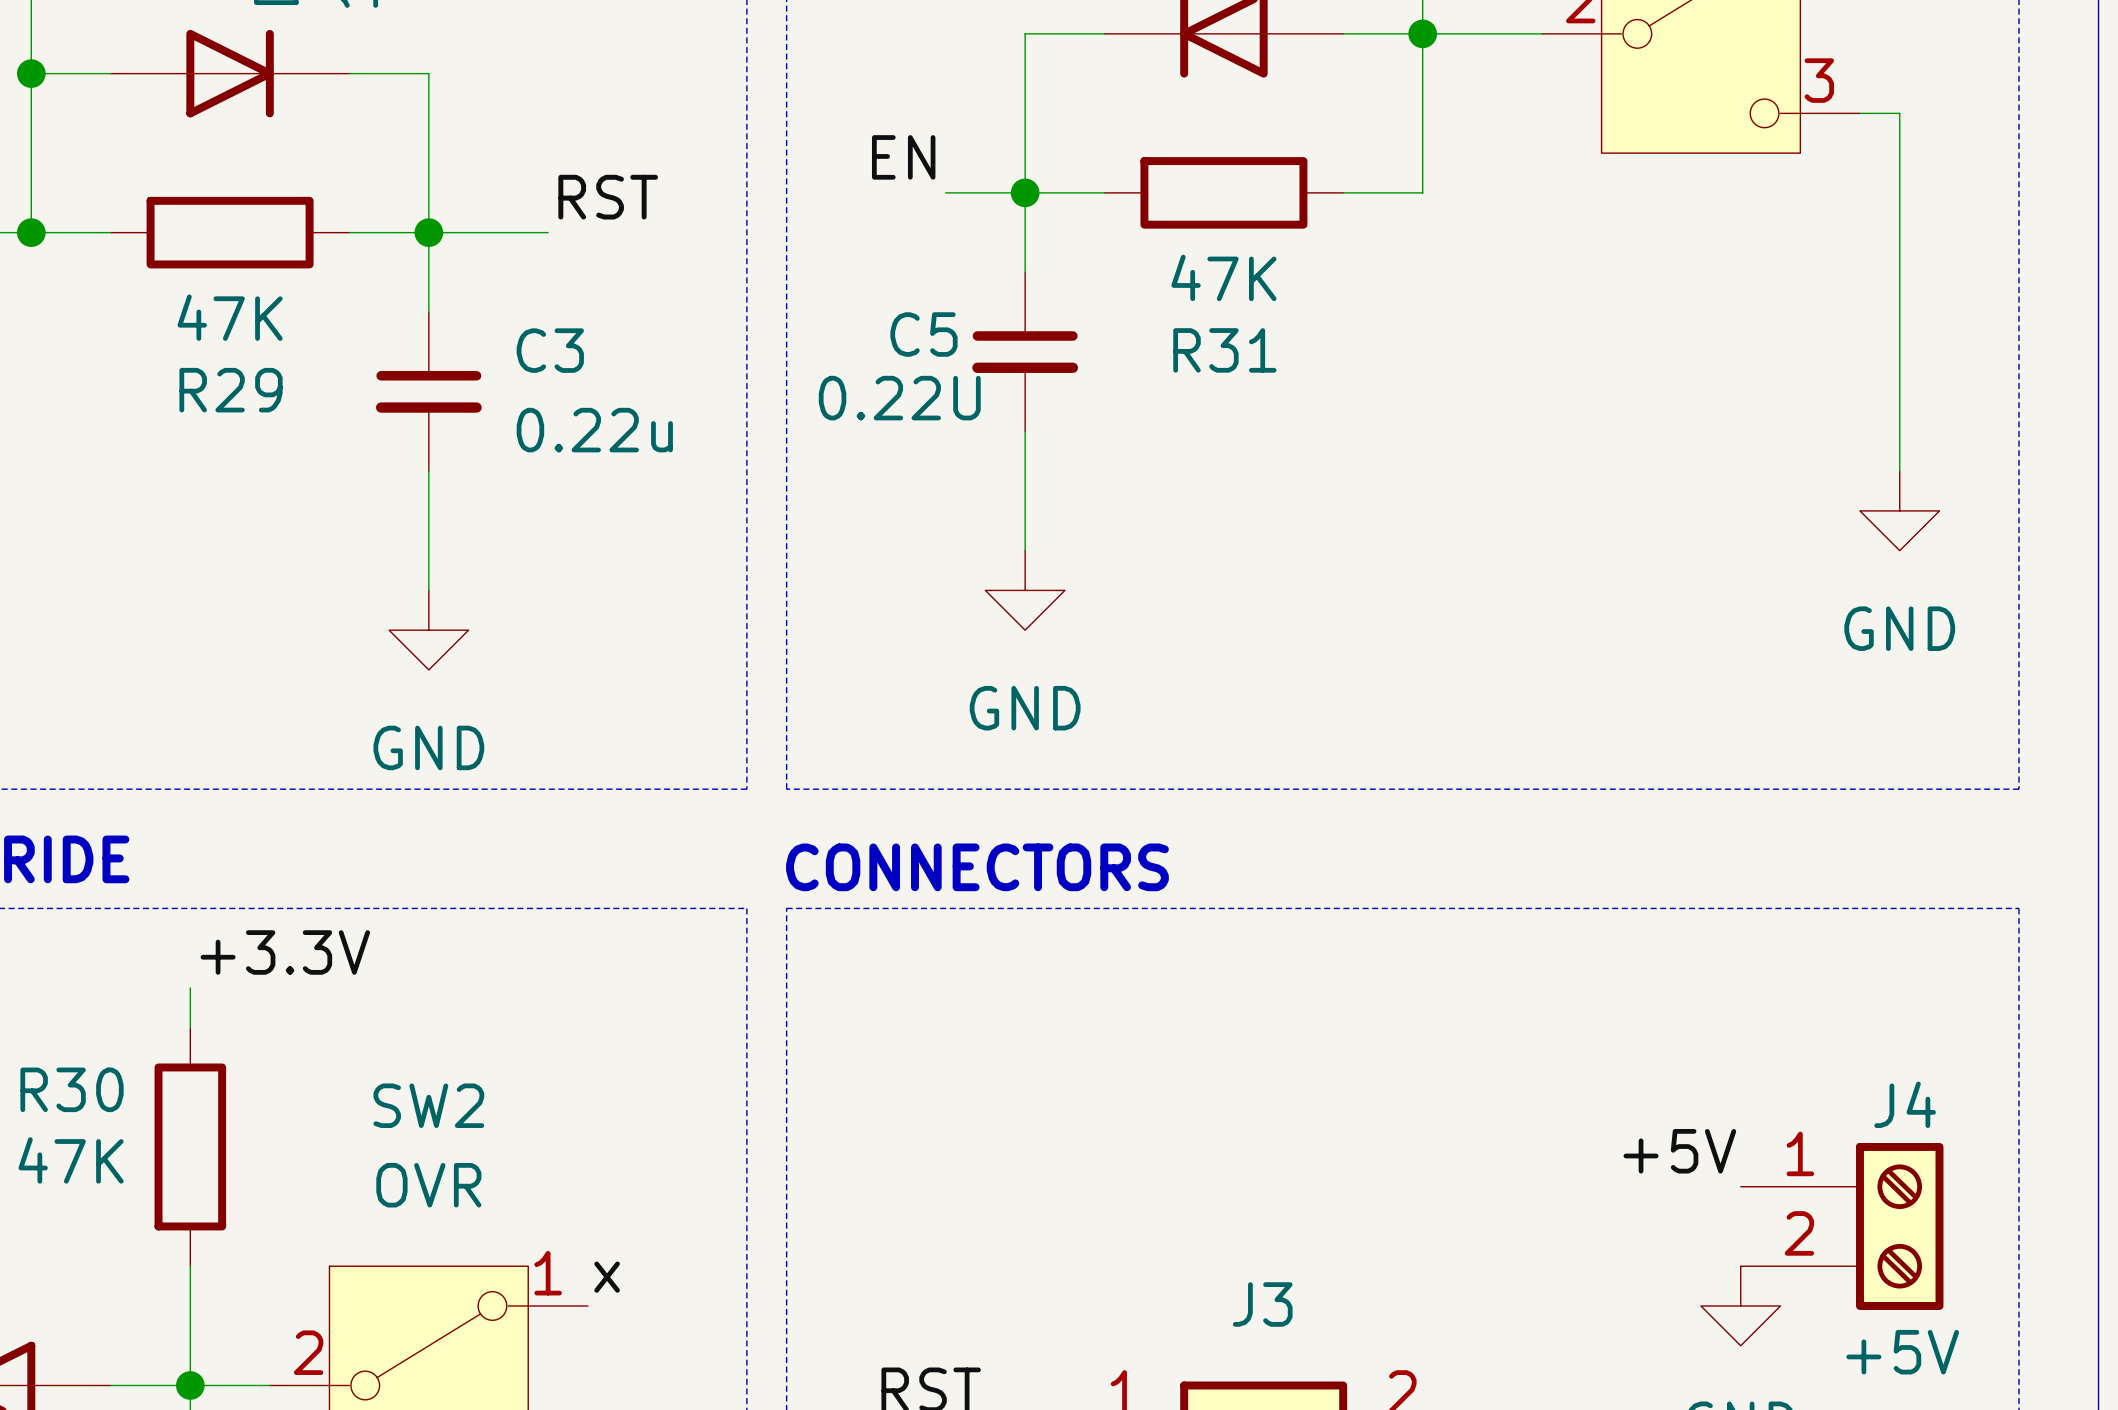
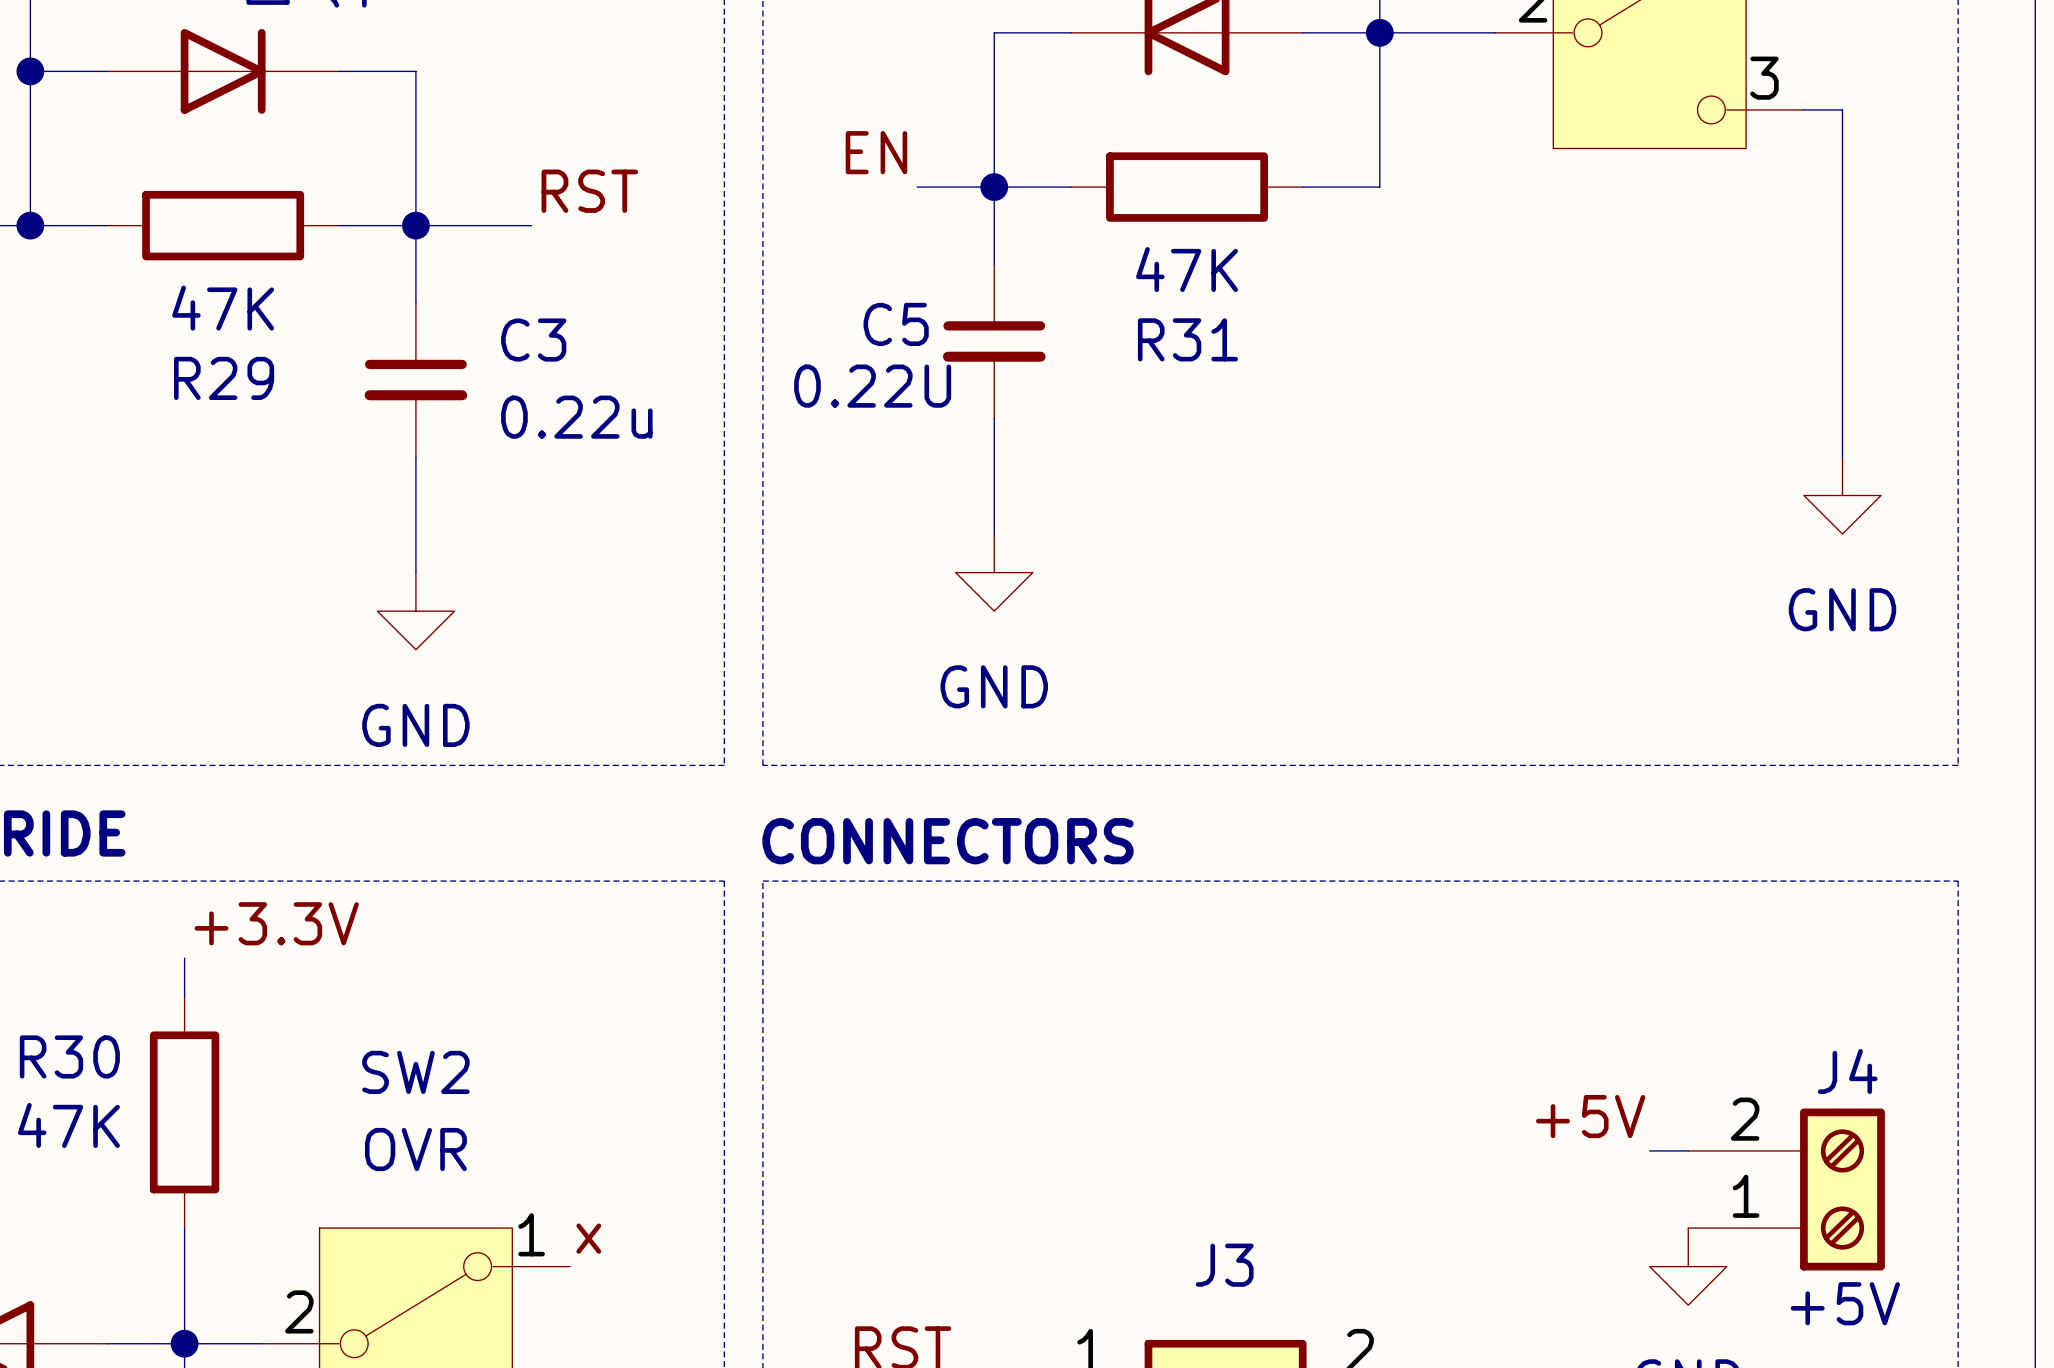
label position: +5V (1679, 1151) -> +5V (1590, 1116)
wire: none -> (1649, 1150) (1688, 1150)
J4 flip: as is (1899, 1226) -> up-down (1842, 1189)

